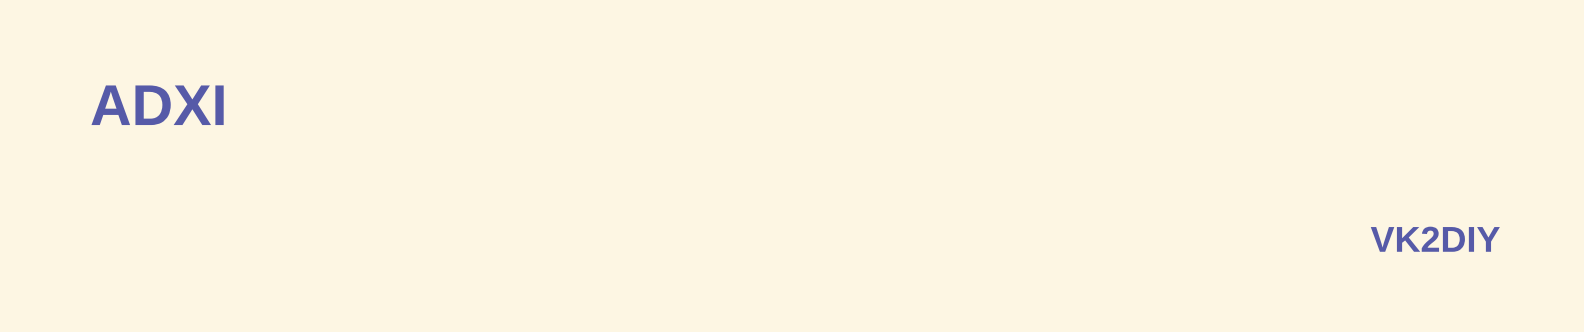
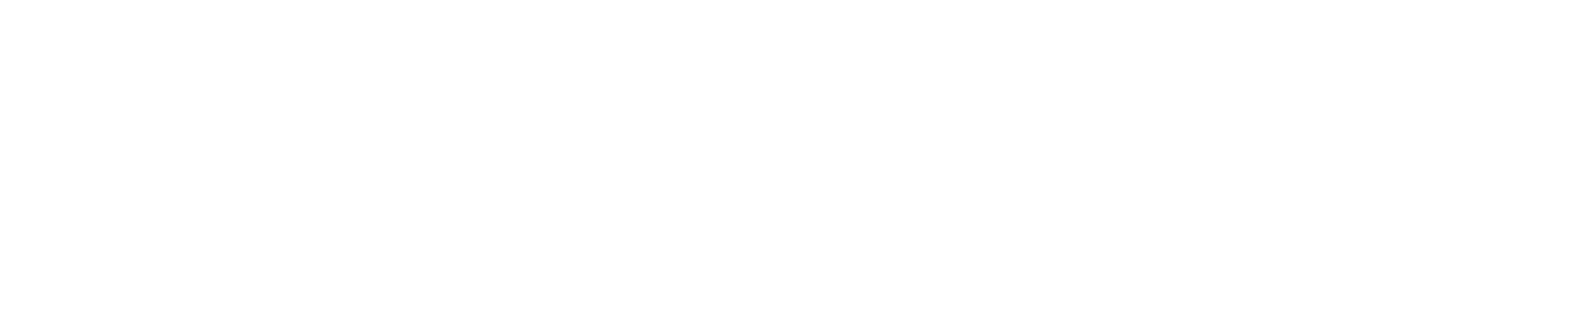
text: ADXI (157, 105) -> none
text: VK2DIY (1435, 239) -> none

